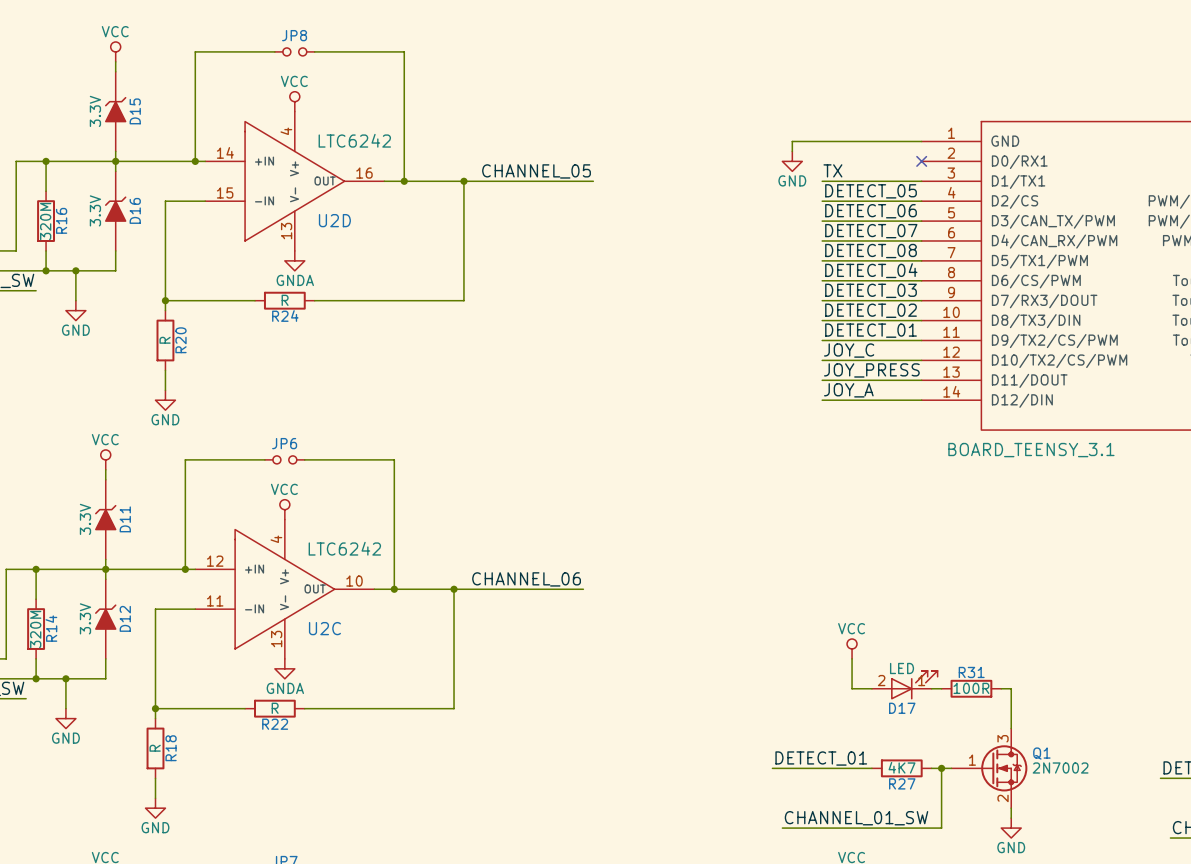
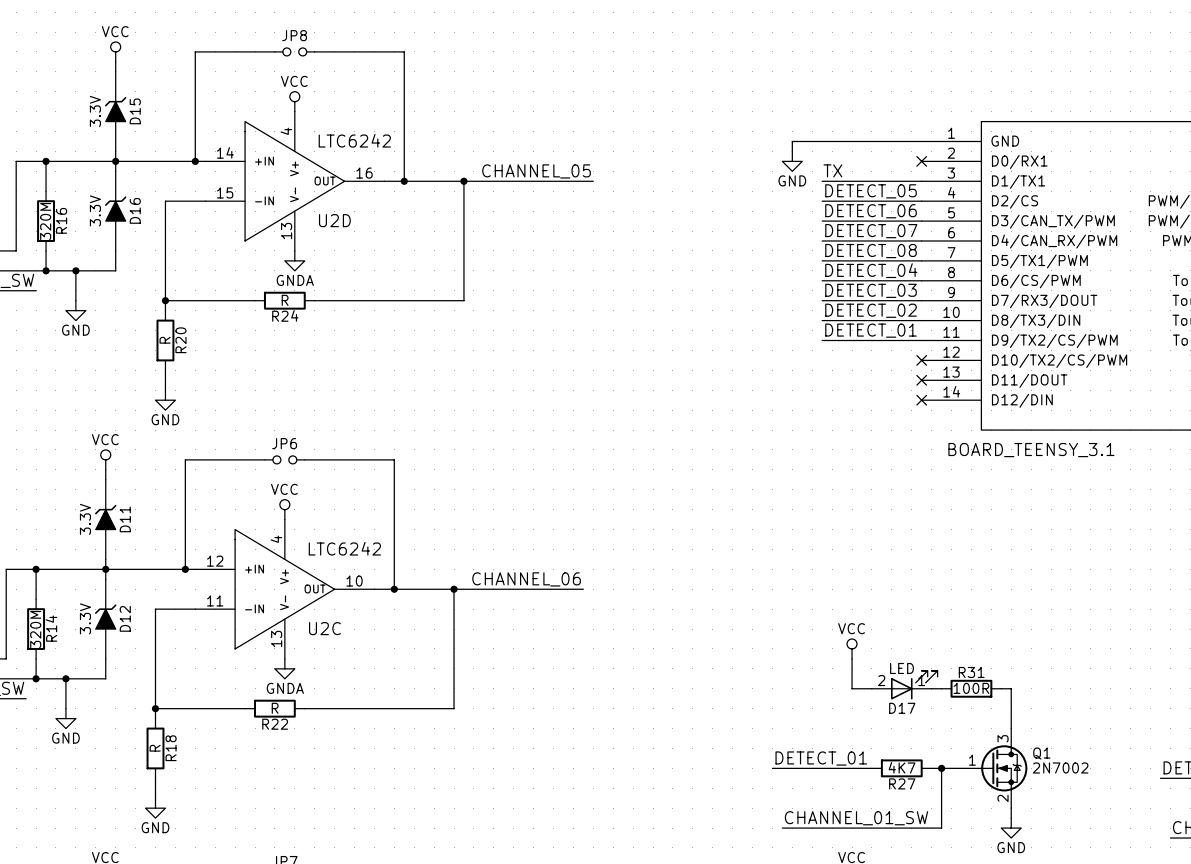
label: JOY_C (849, 350) -> none
wire: (822, 360) (921, 360) -> none
no-connect mark: none -> (921, 360)
label: JOY_PRESS (871, 370) -> none
wire: (822, 380) (921, 380) -> none
no-connect mark: none -> (921, 380)
label: JOY_A (848, 390) -> none
wire: (822, 400) (921, 400) -> none
no-connect mark: none -> (921, 400)

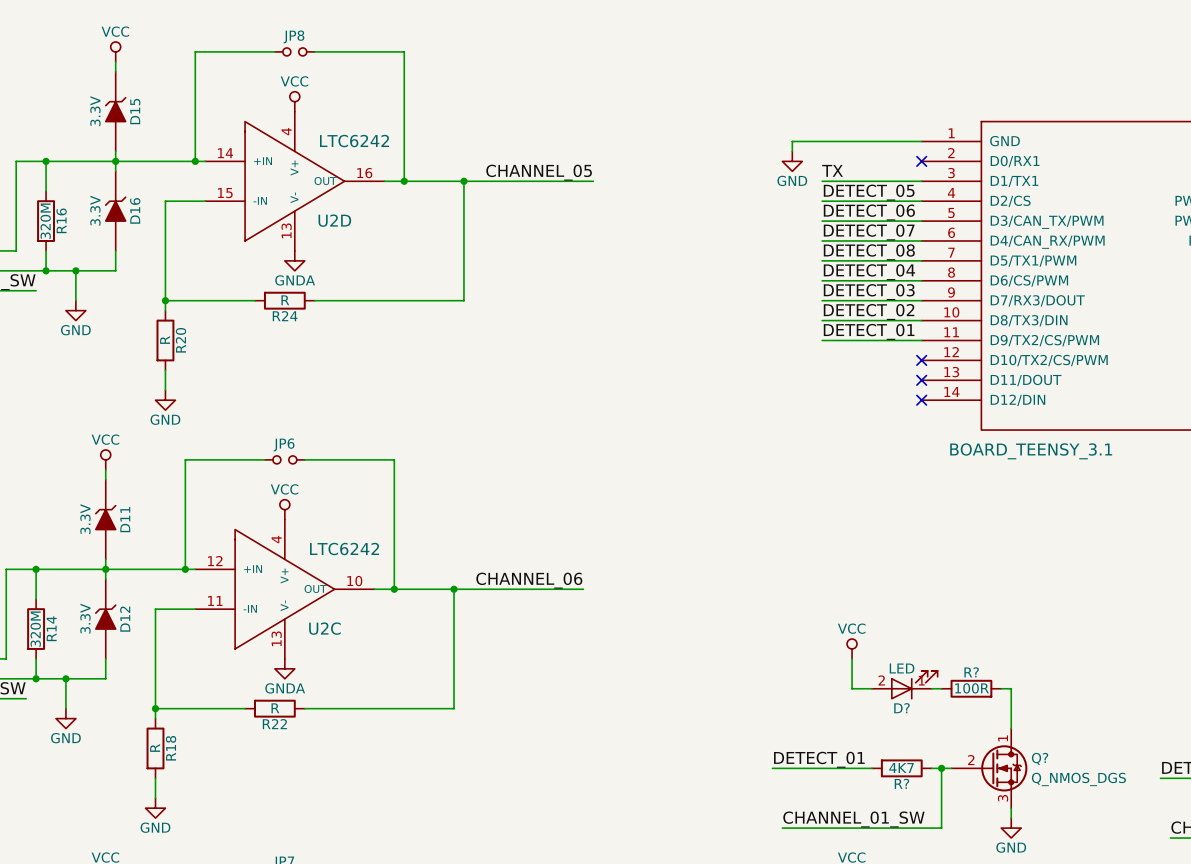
R31 name: R31 (971, 672) -> R? (971, 672)
D17 name: D17 (902, 708) -> D? (901, 708)
Q1: 2N7002 (989, 768) -> none
Q?: none -> Q_NMOS_DGS (989, 768)
R27 name: R27 (902, 783) -> R? (901, 783)

